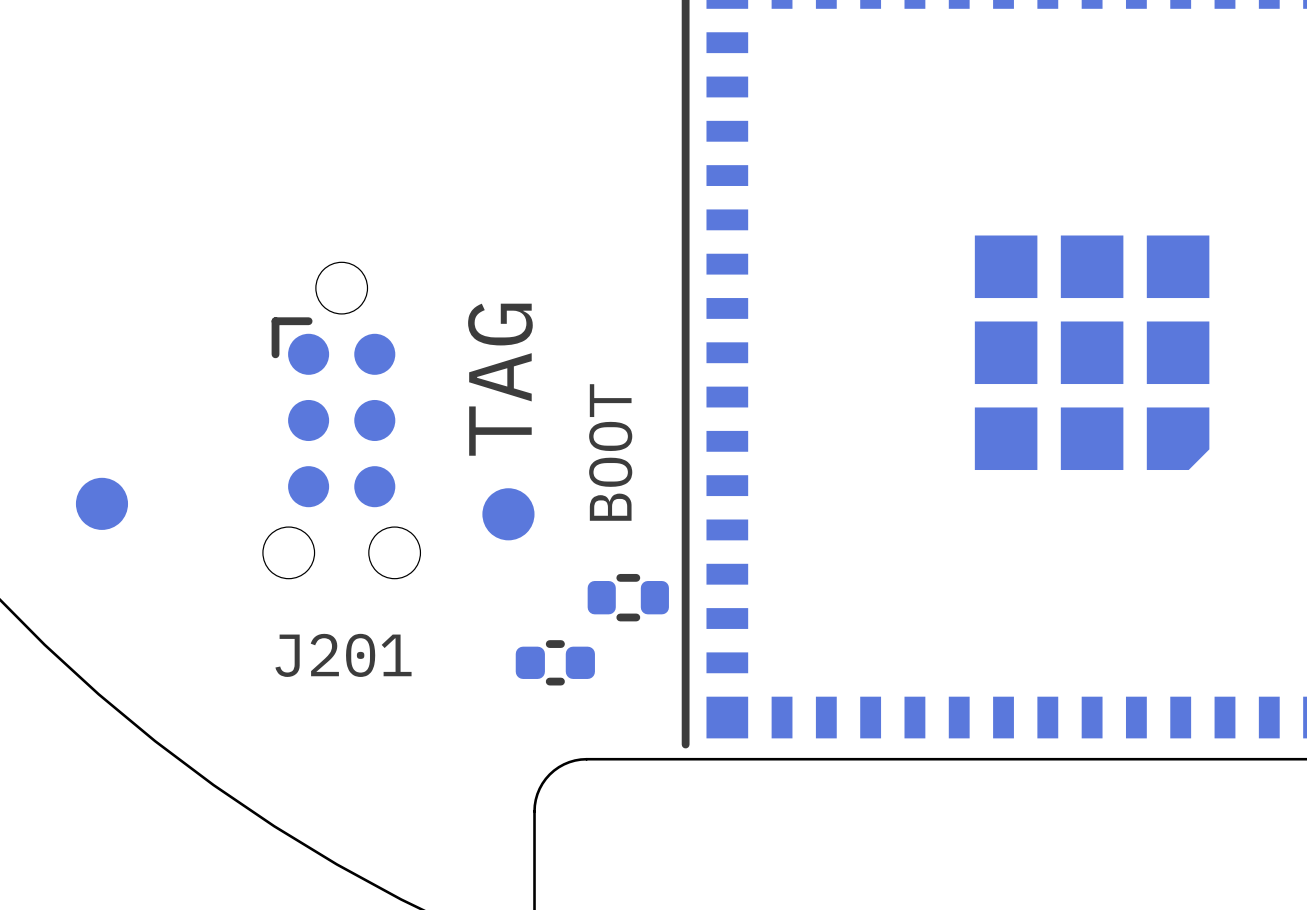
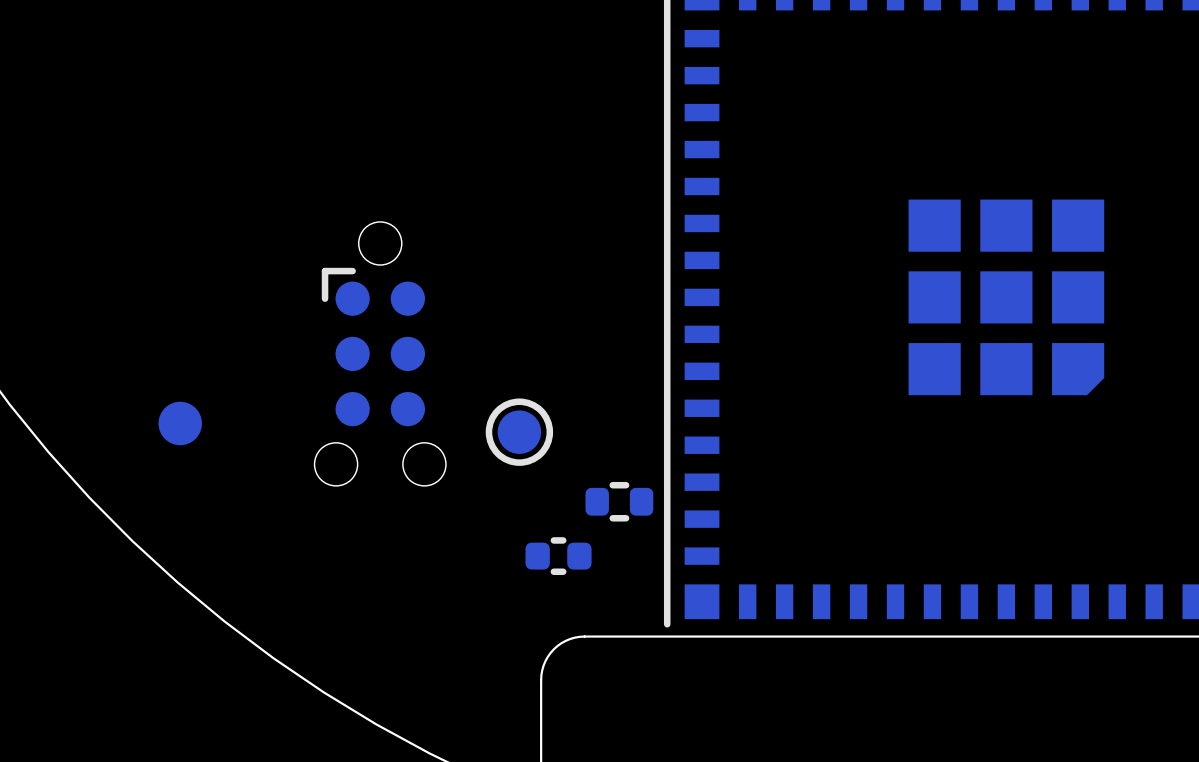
text: TAG (500, 379) -> none
text: BOOT (610, 452) -> none
part footprint: [482, 488, 535, 541] -> [485, 398, 554, 466]
J201 name: J201 (343, 655) -> none

